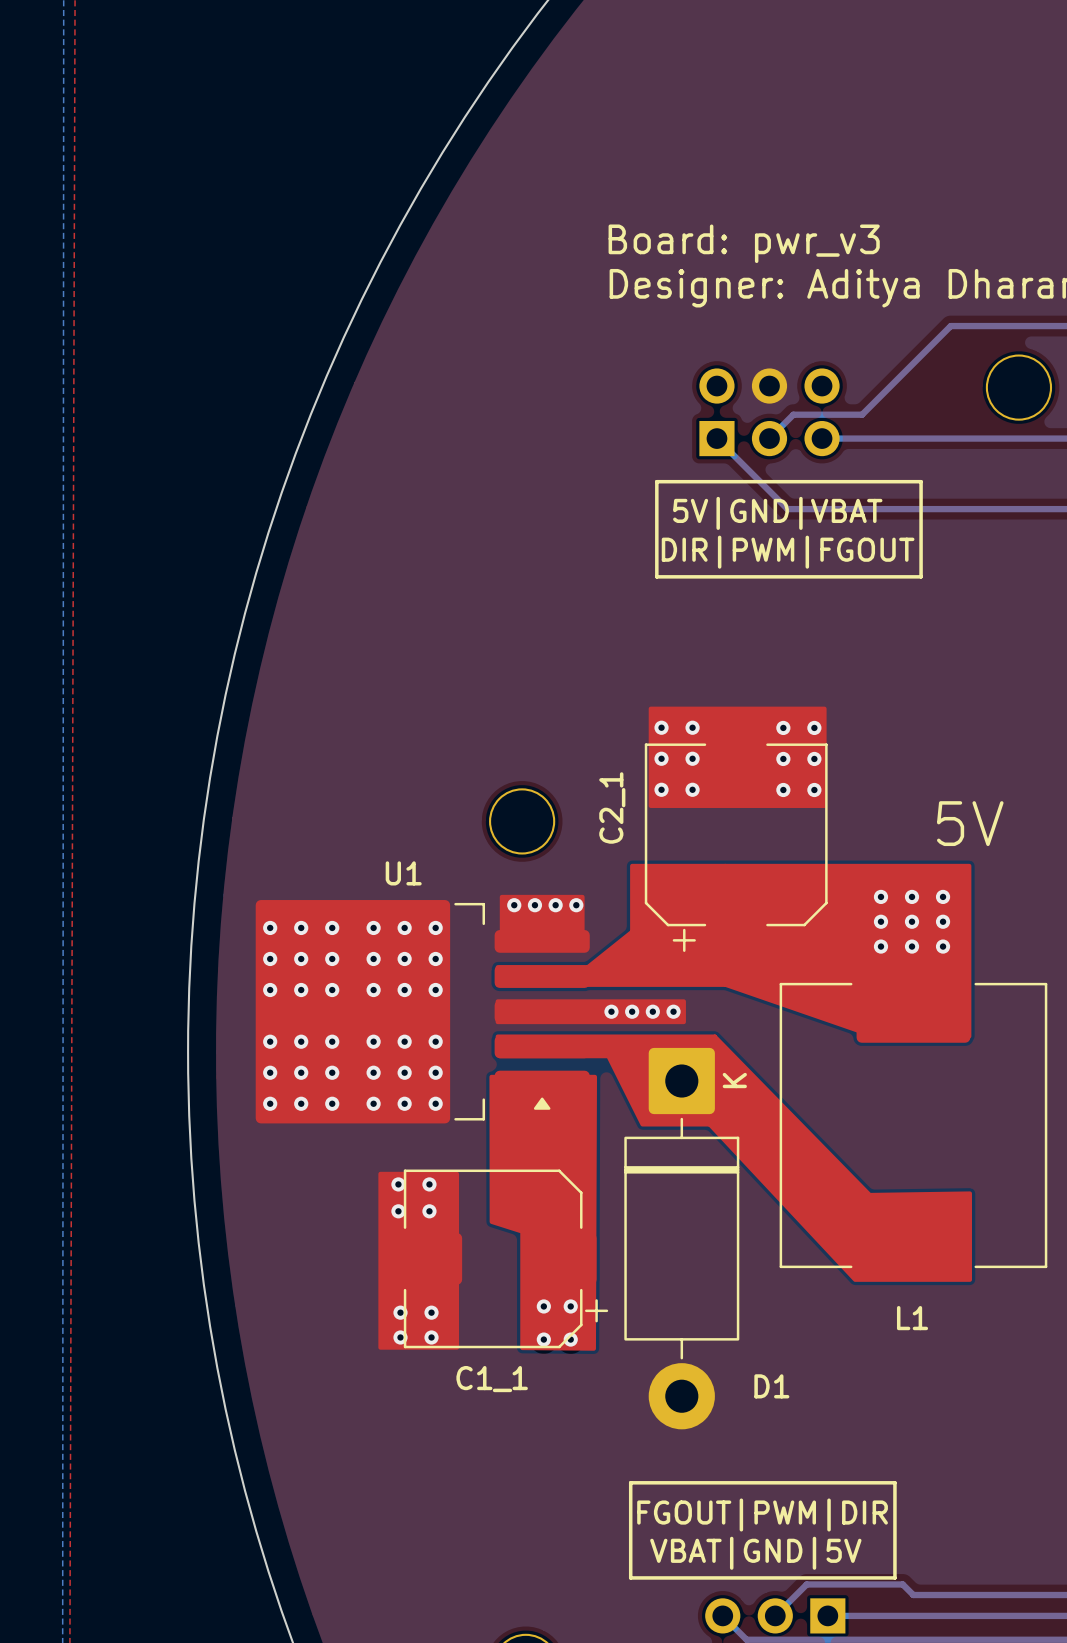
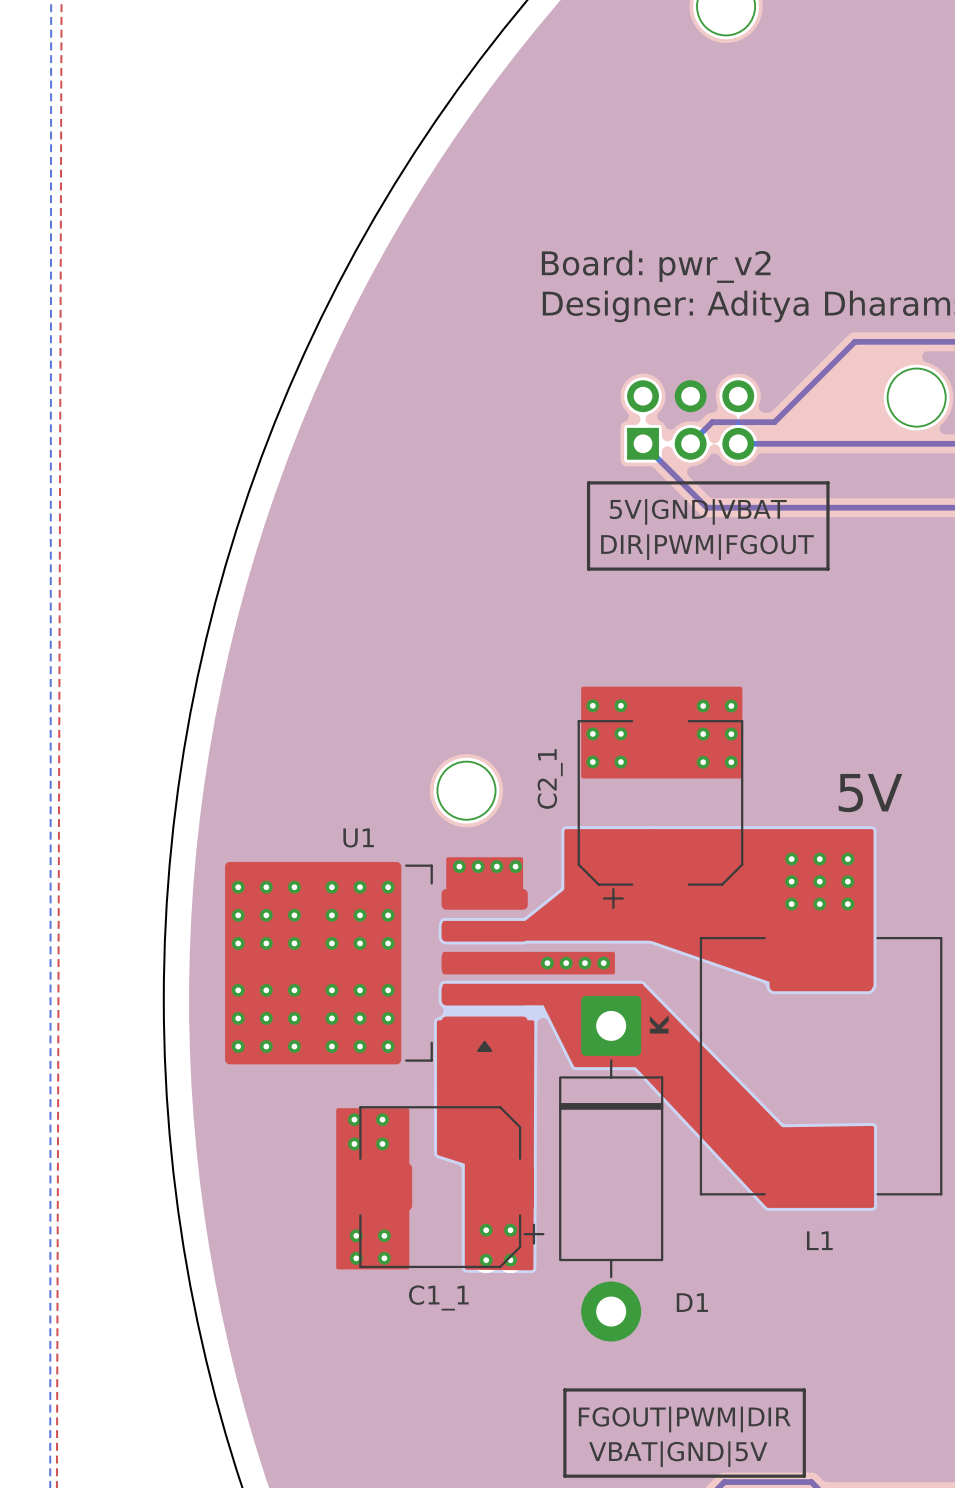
text: Board: pwr_v3 (744, 243) -> Board: pwr_v2 (656, 266)

